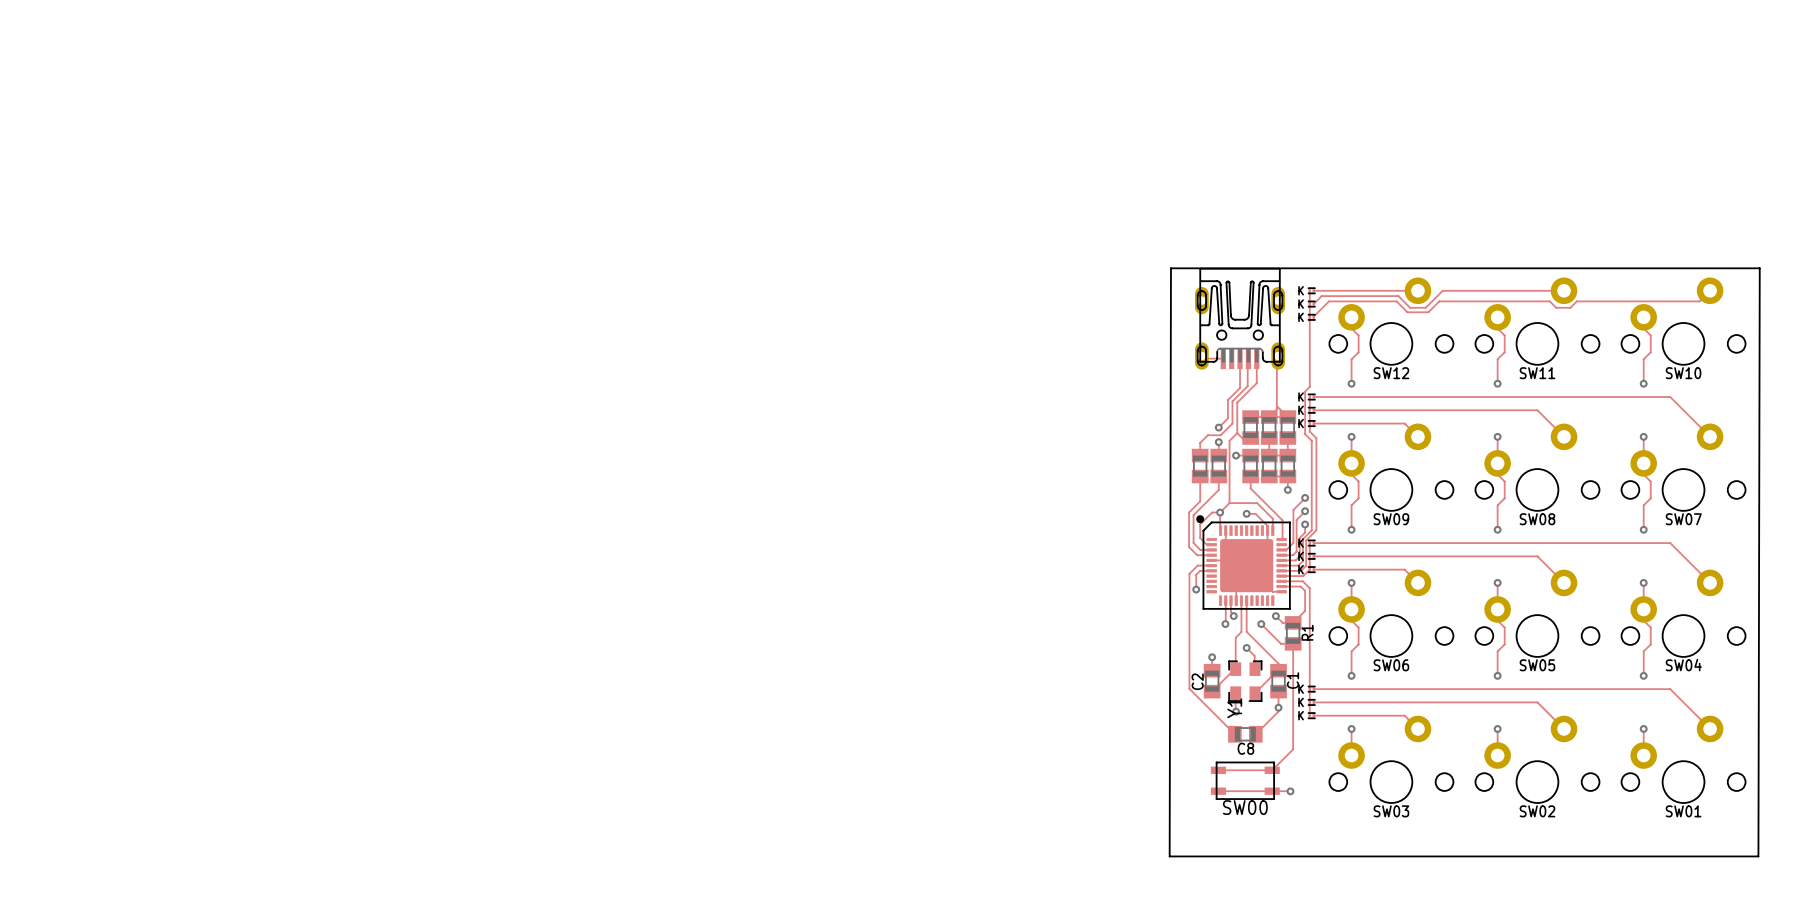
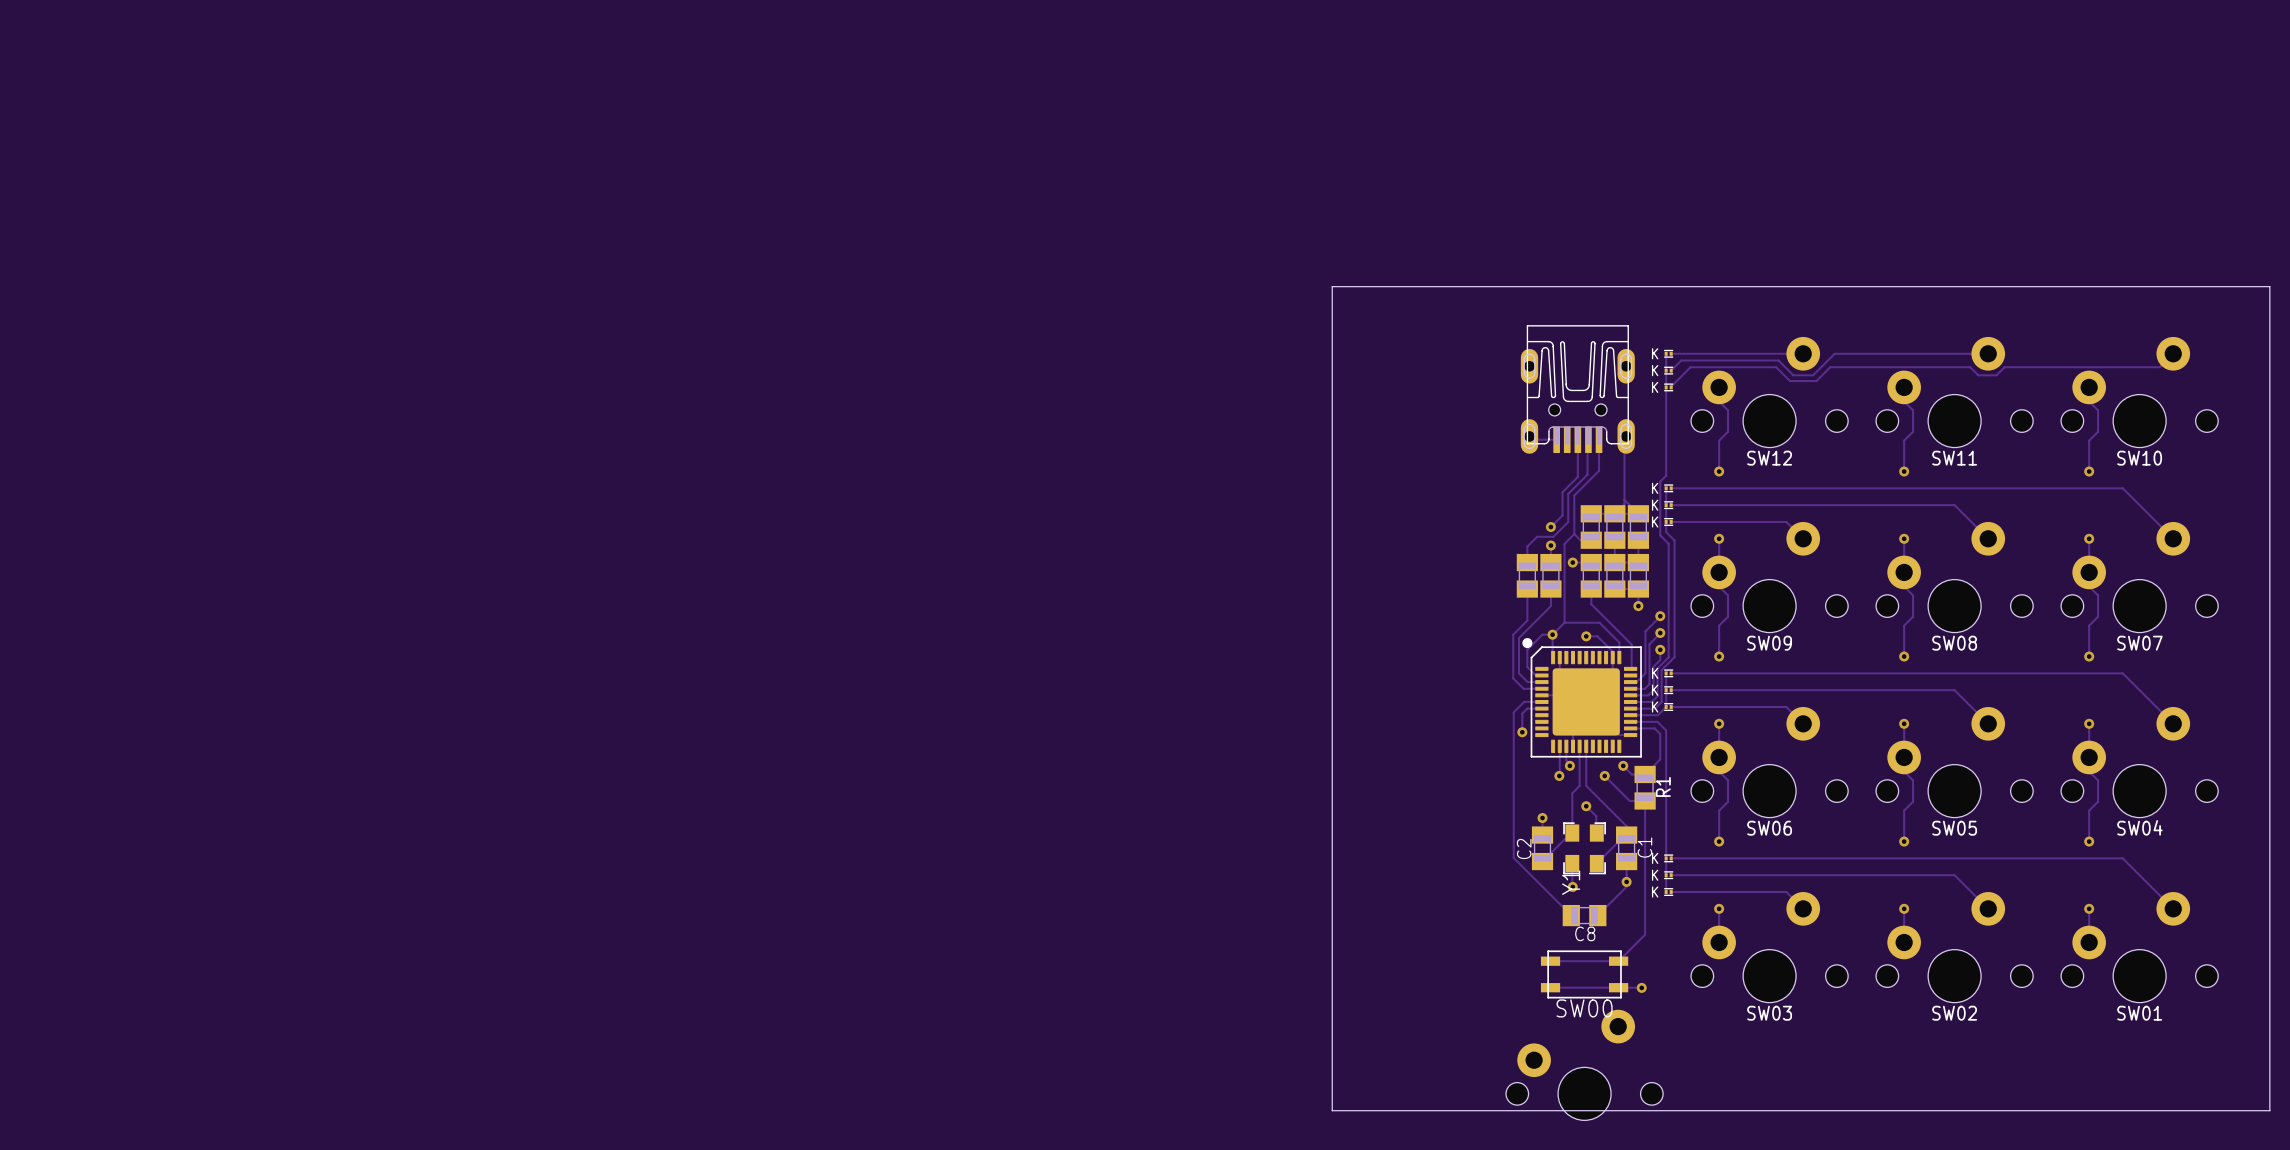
board edge: (1170, 268) (1759, 268) (1758, 856) (1169, 856) (1170, 268) -> (1332, 286) (1332, 1110) (2269, 1110) (2269, 286) (1332, 286)
part: none -> (1584, 1065)

